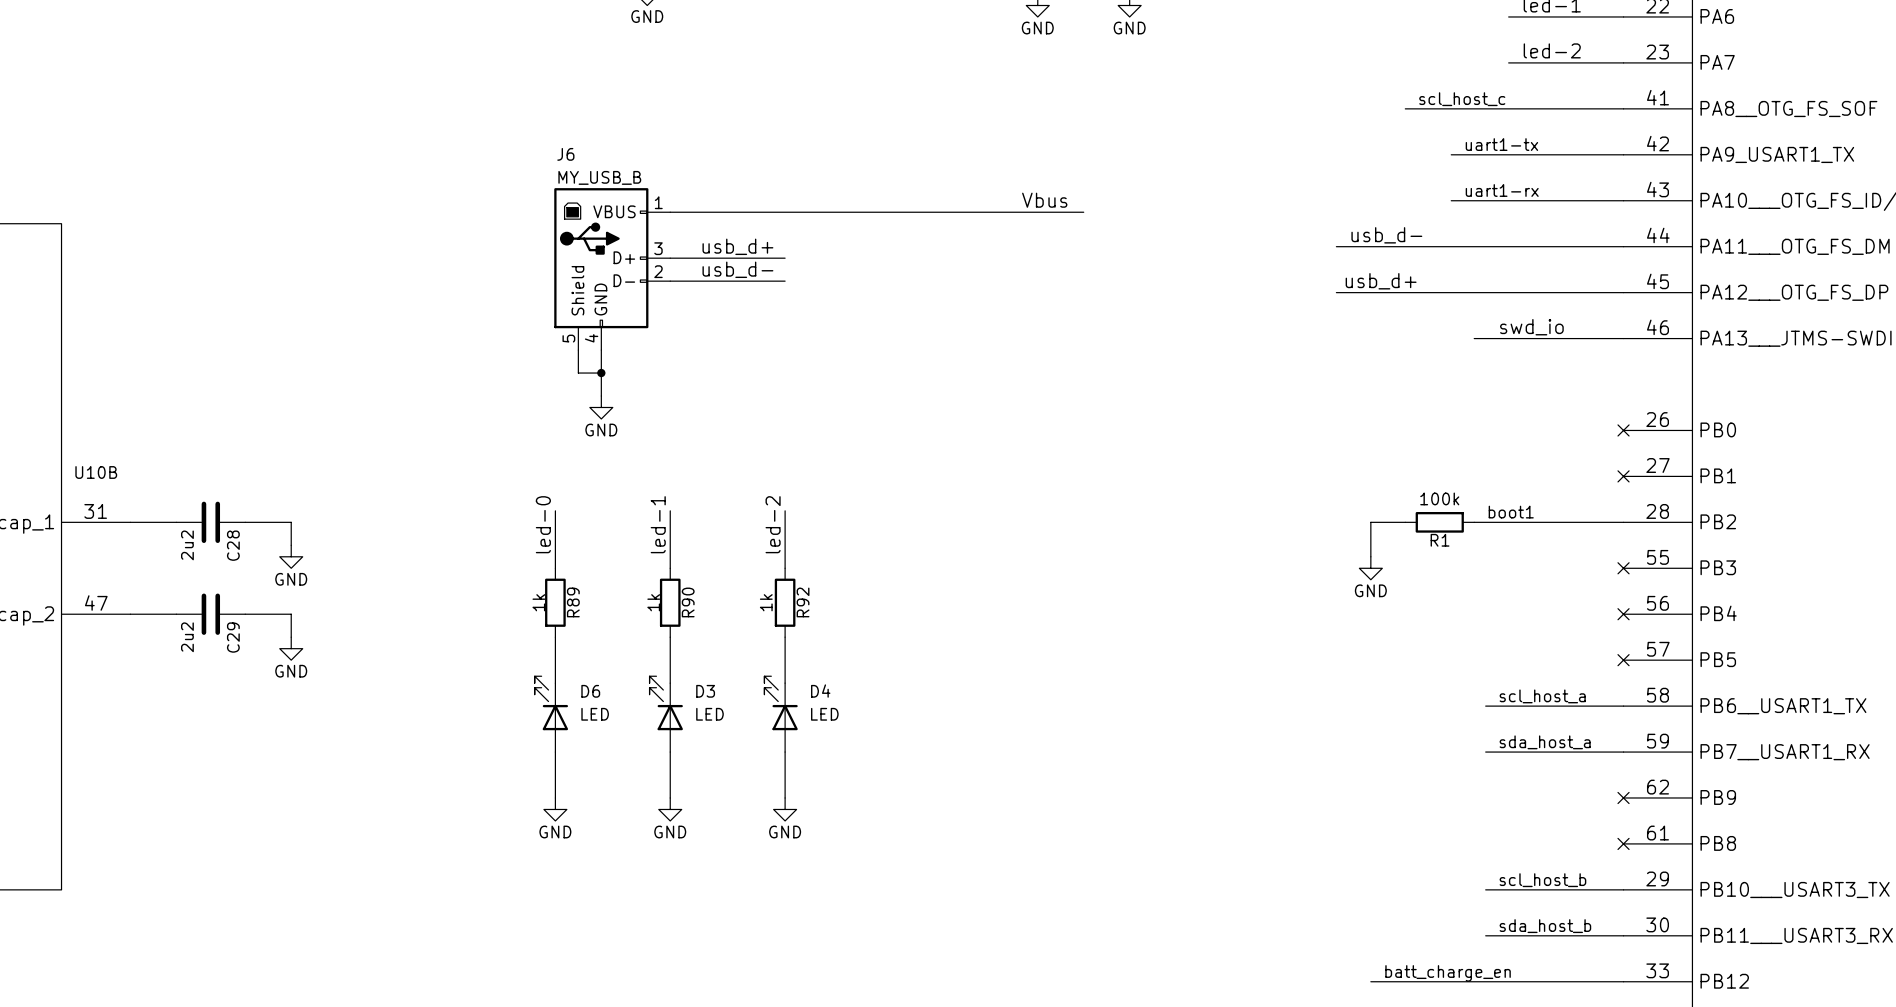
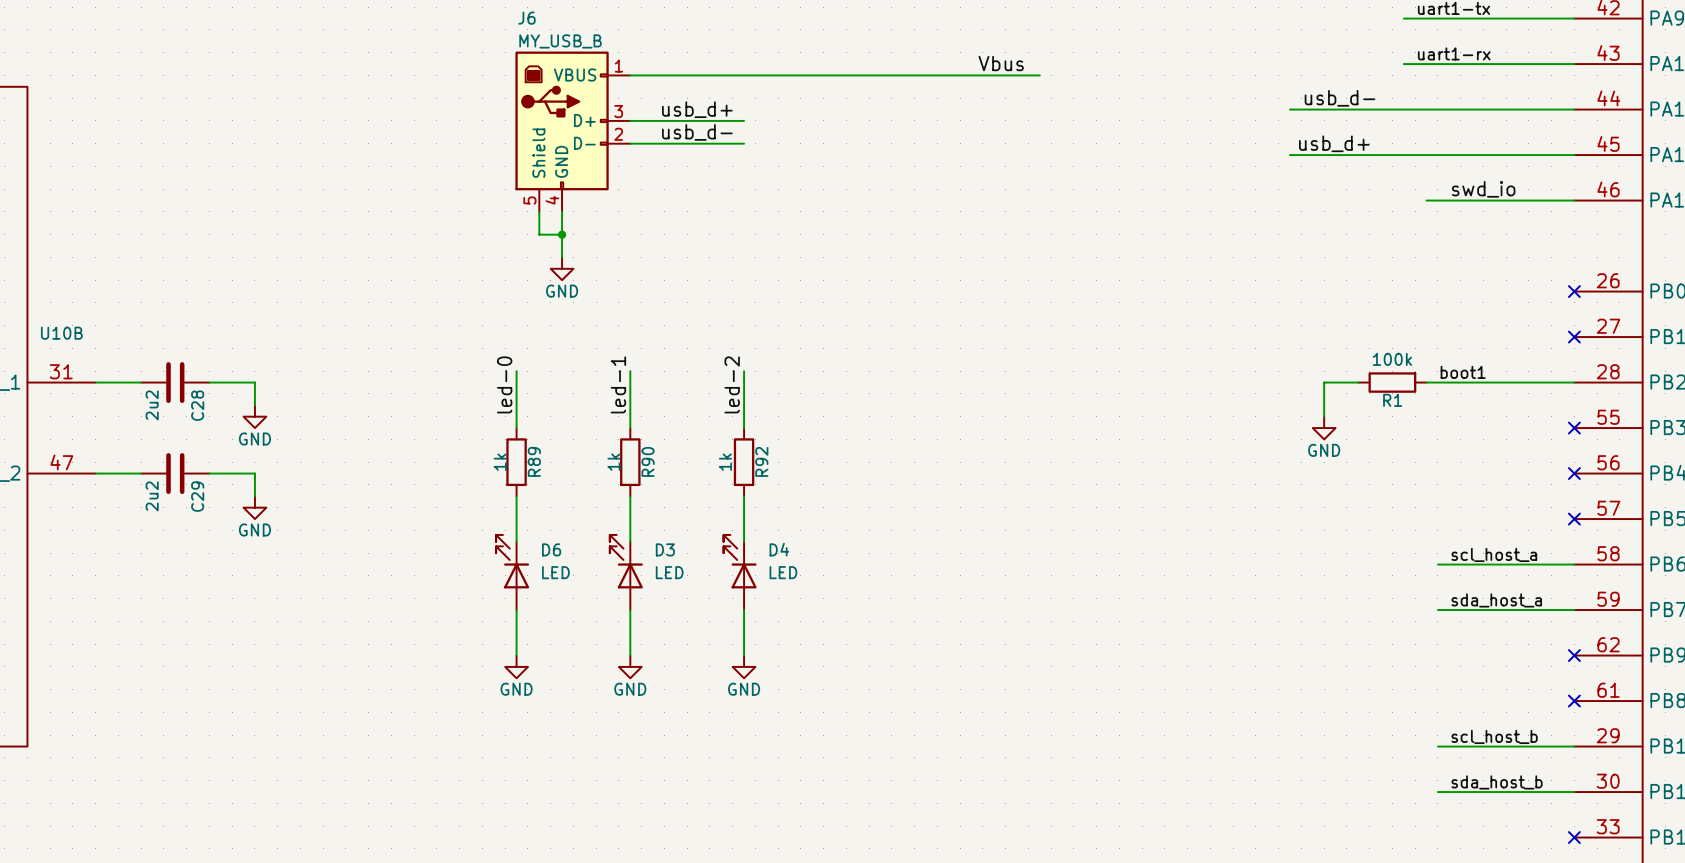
label: batt_charge_en (1448, 973) -> none
wire: (1370, 981) (1623, 981) -> none
no-connect mark: none -> (1574, 837)

